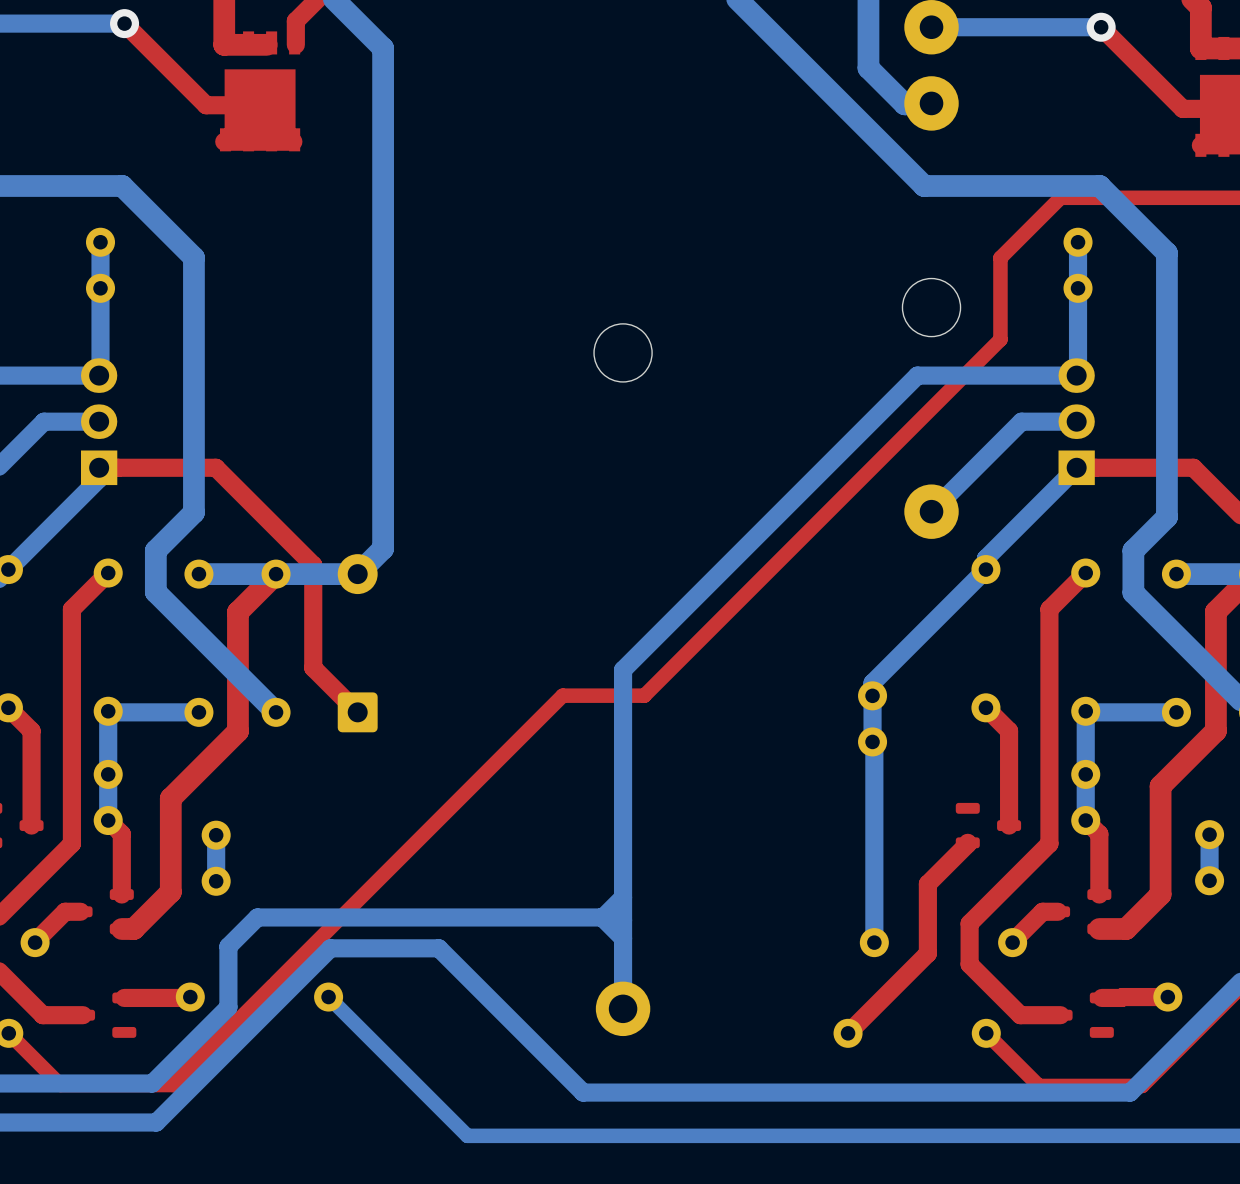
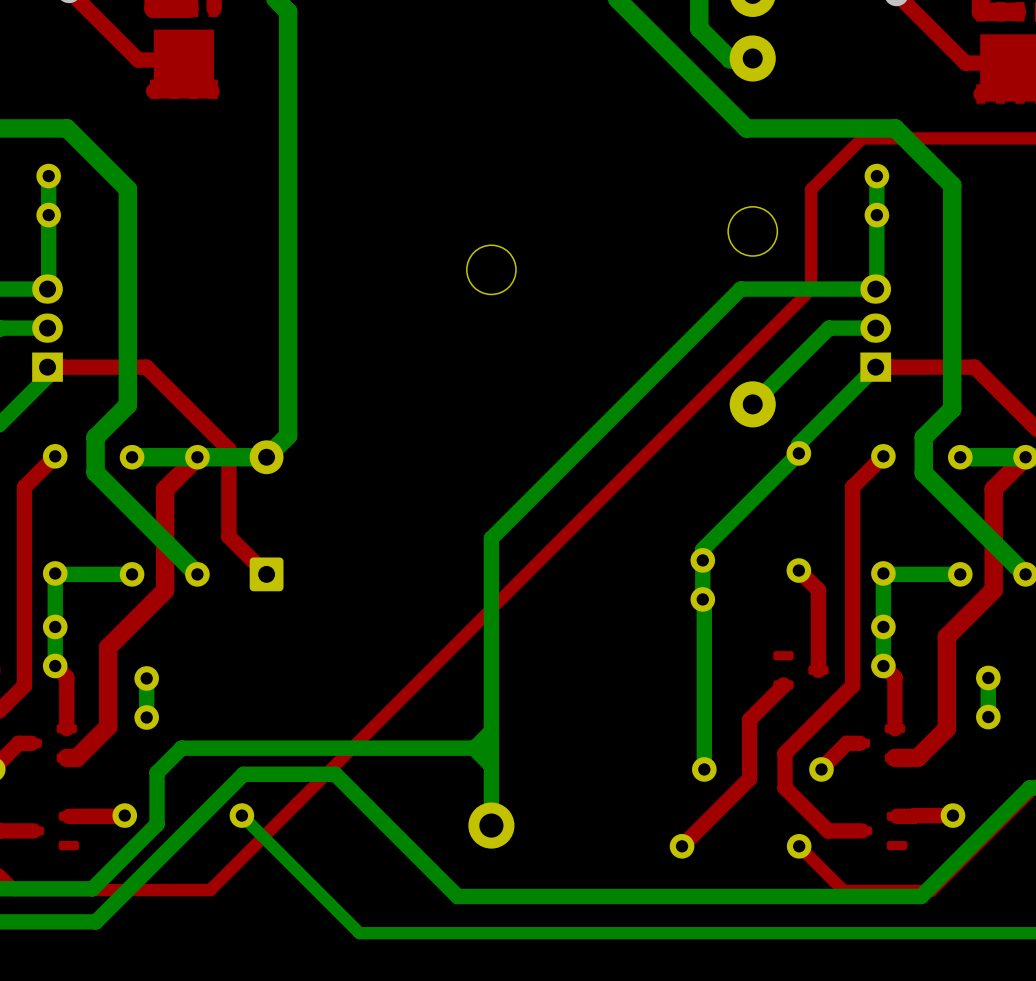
top track: (1000, 339) (644, 695) (562, 695) (275, 982) -> (811, 258) (811, 289) (210, 890) (110, 890)
top track: (273, 985) (173, 1085) -> none

